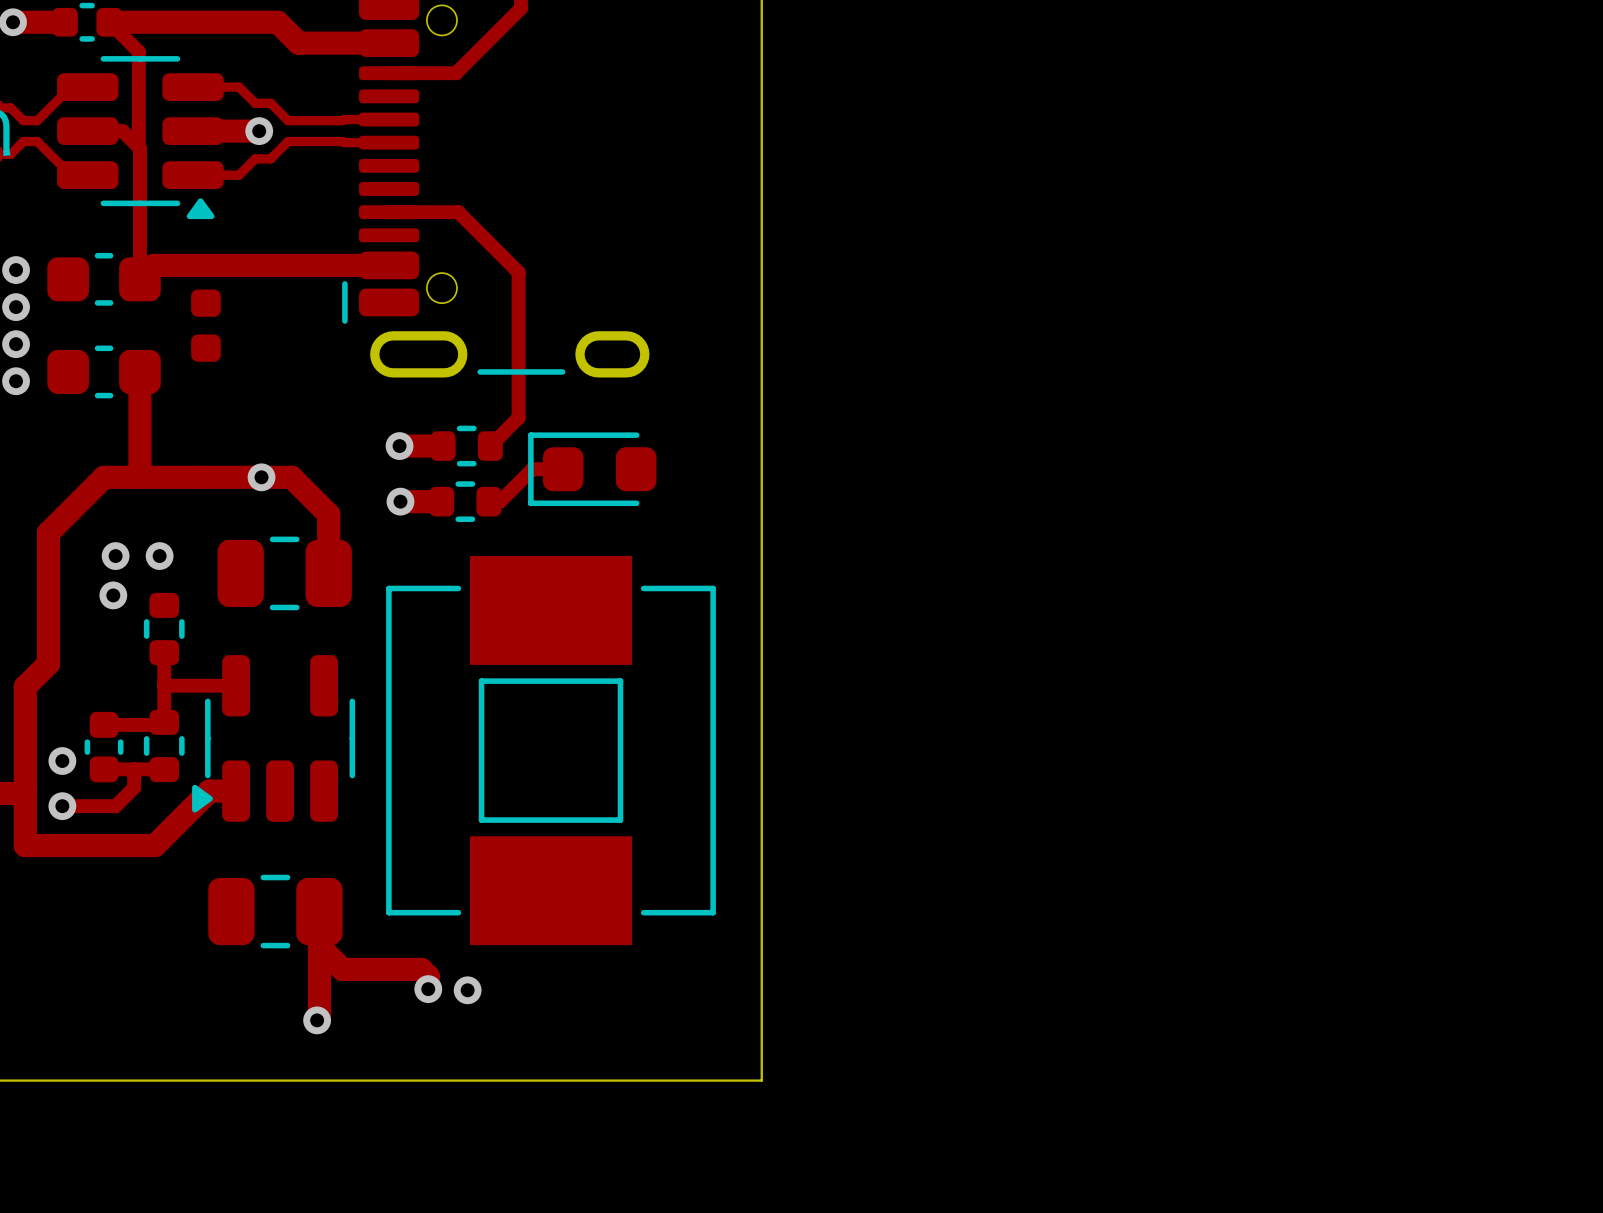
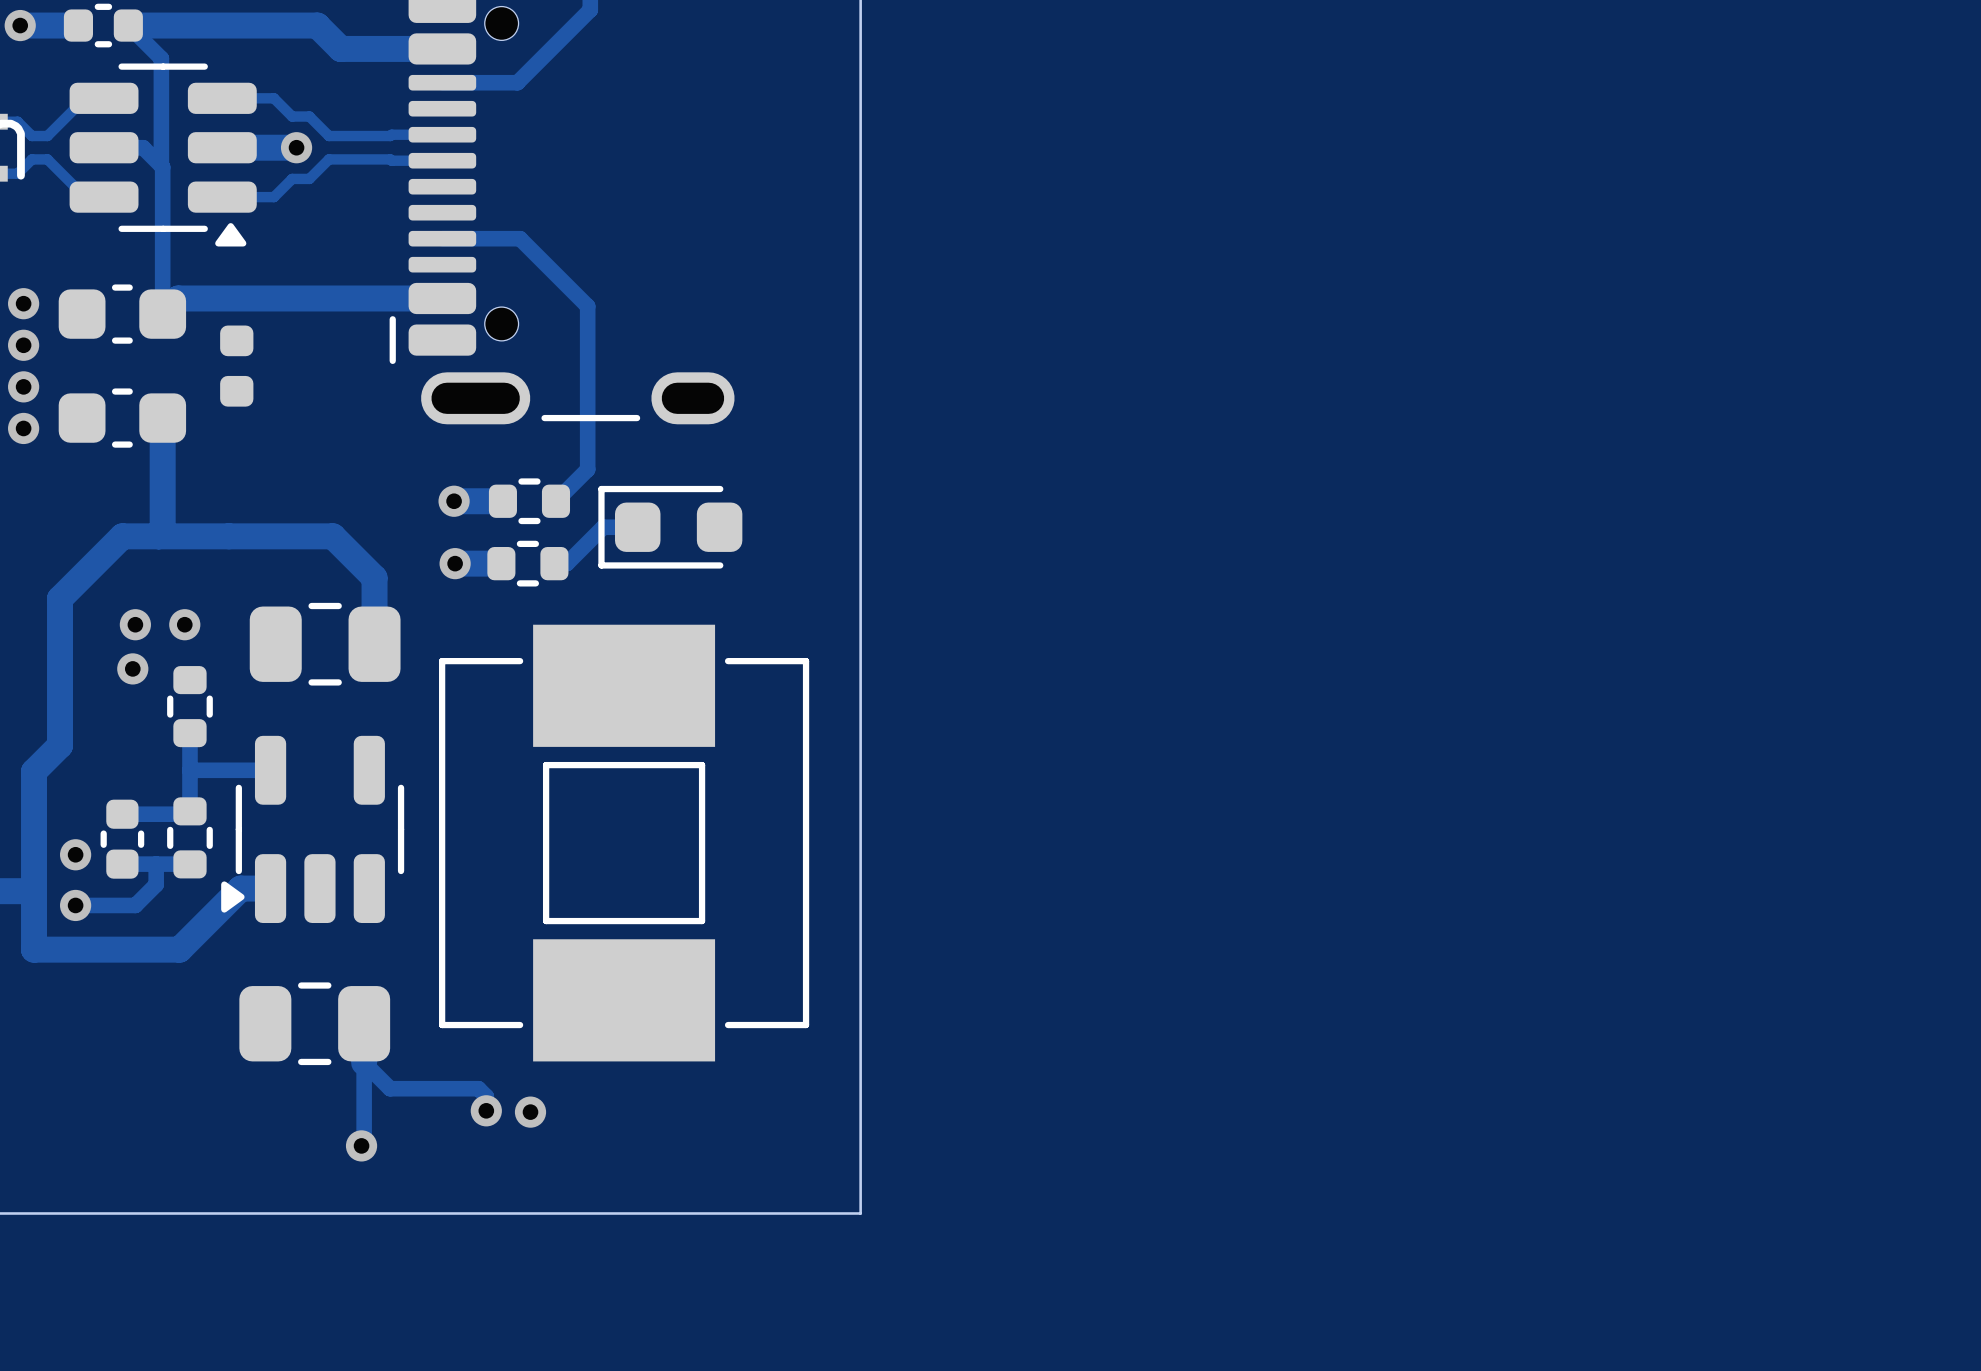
via: (261, 477) -> none
track width: thick (428, 989) (428, 976) (421, 969) (342, 969) (319, 946) (319, 1018) -> thin (486, 1110) (486, 1096) (478, 1088) (390, 1088) (364, 1062) (364, 1143)

